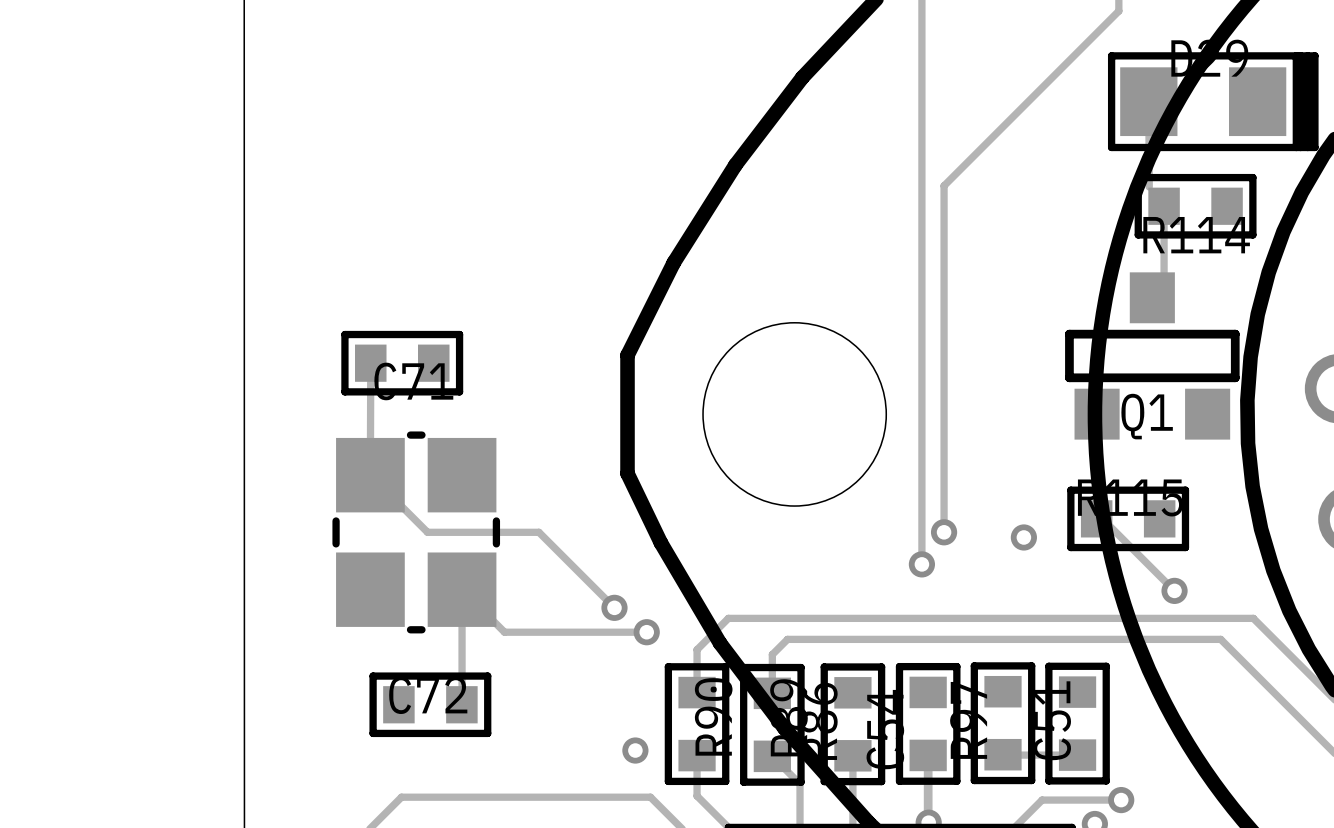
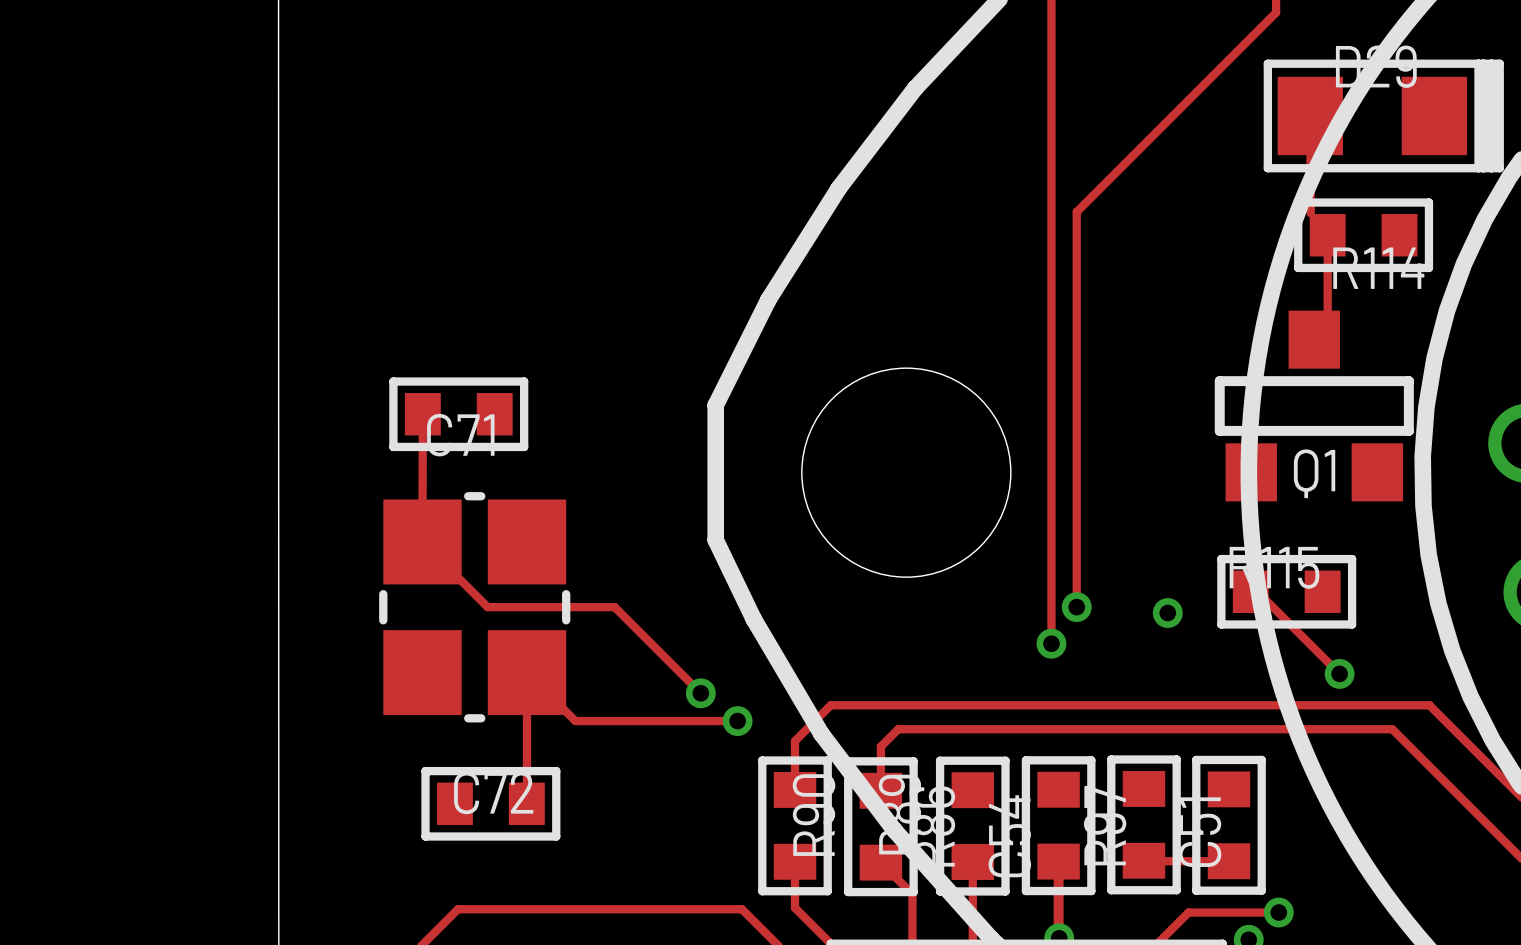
via: (635, 750) -> none

